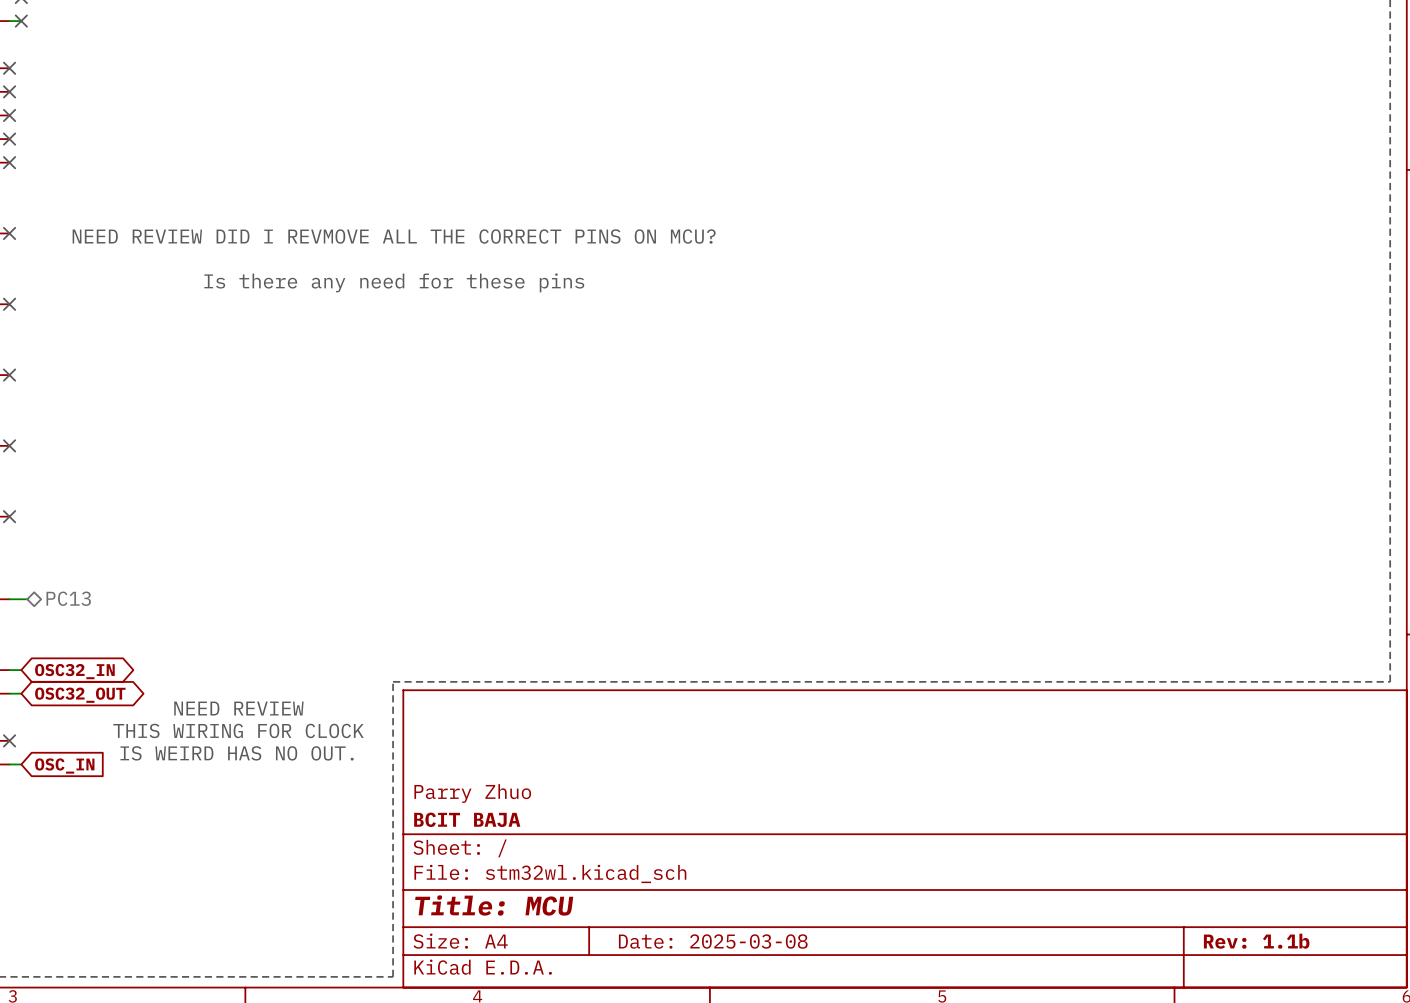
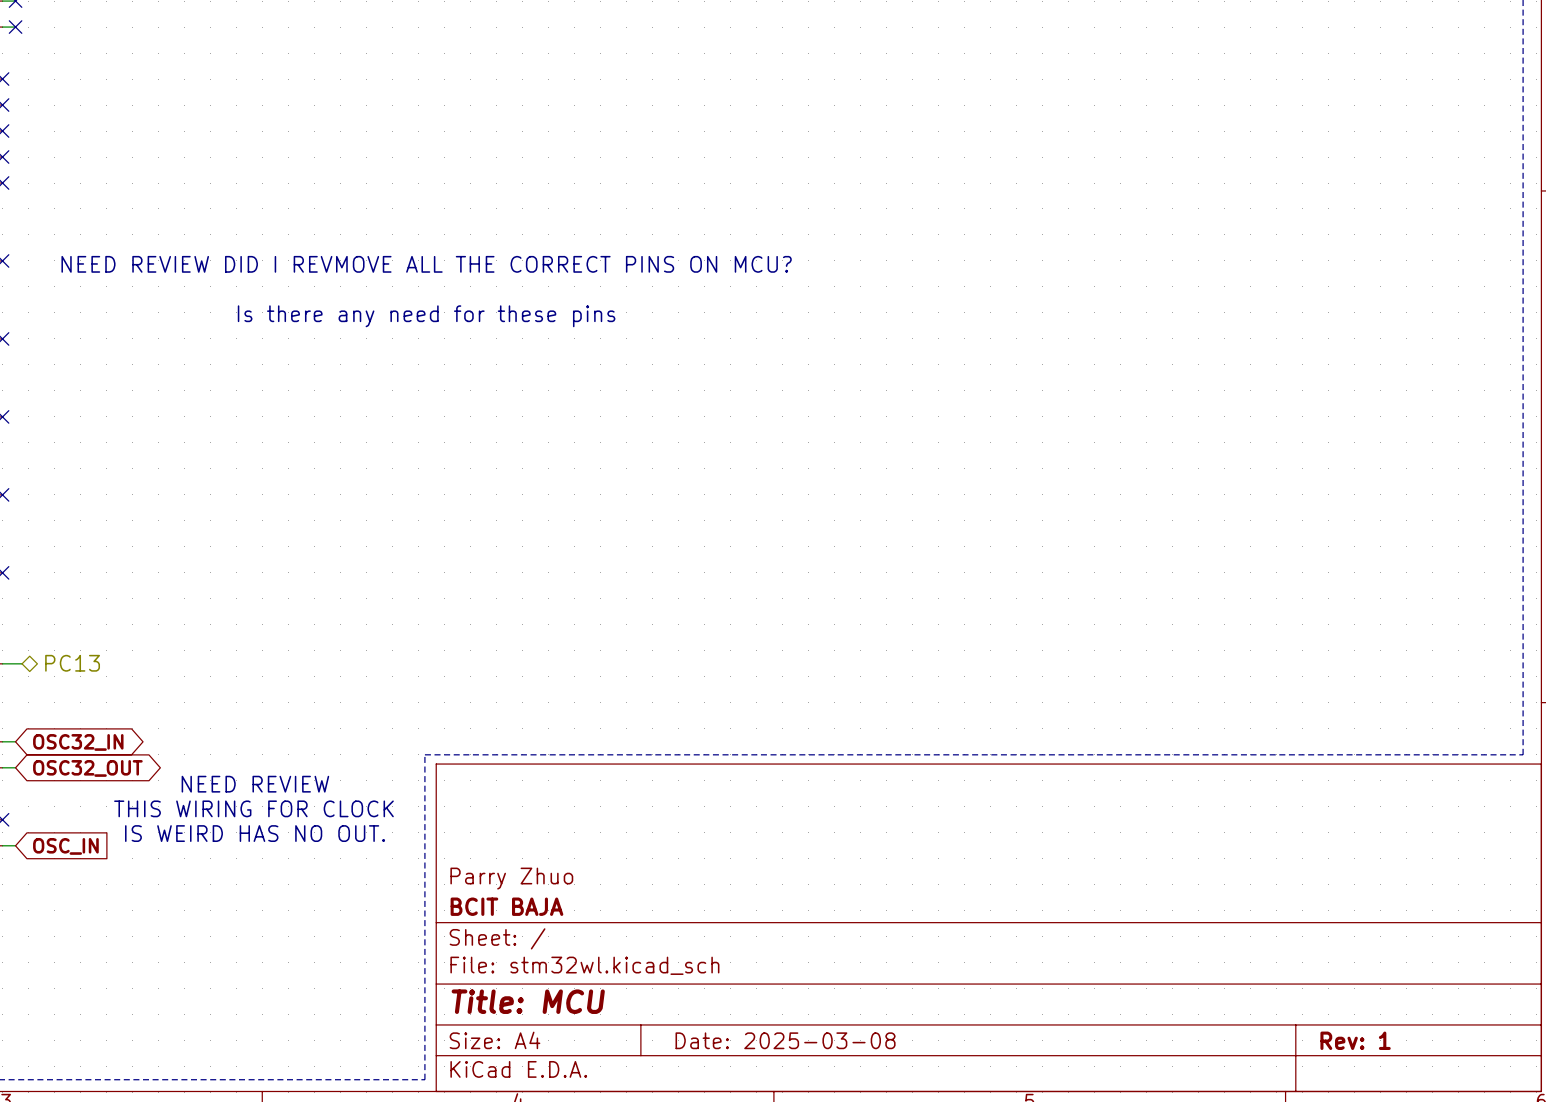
title block: Rev: 1.1b (1256, 941) -> Rev: 1 (1355, 1040)

